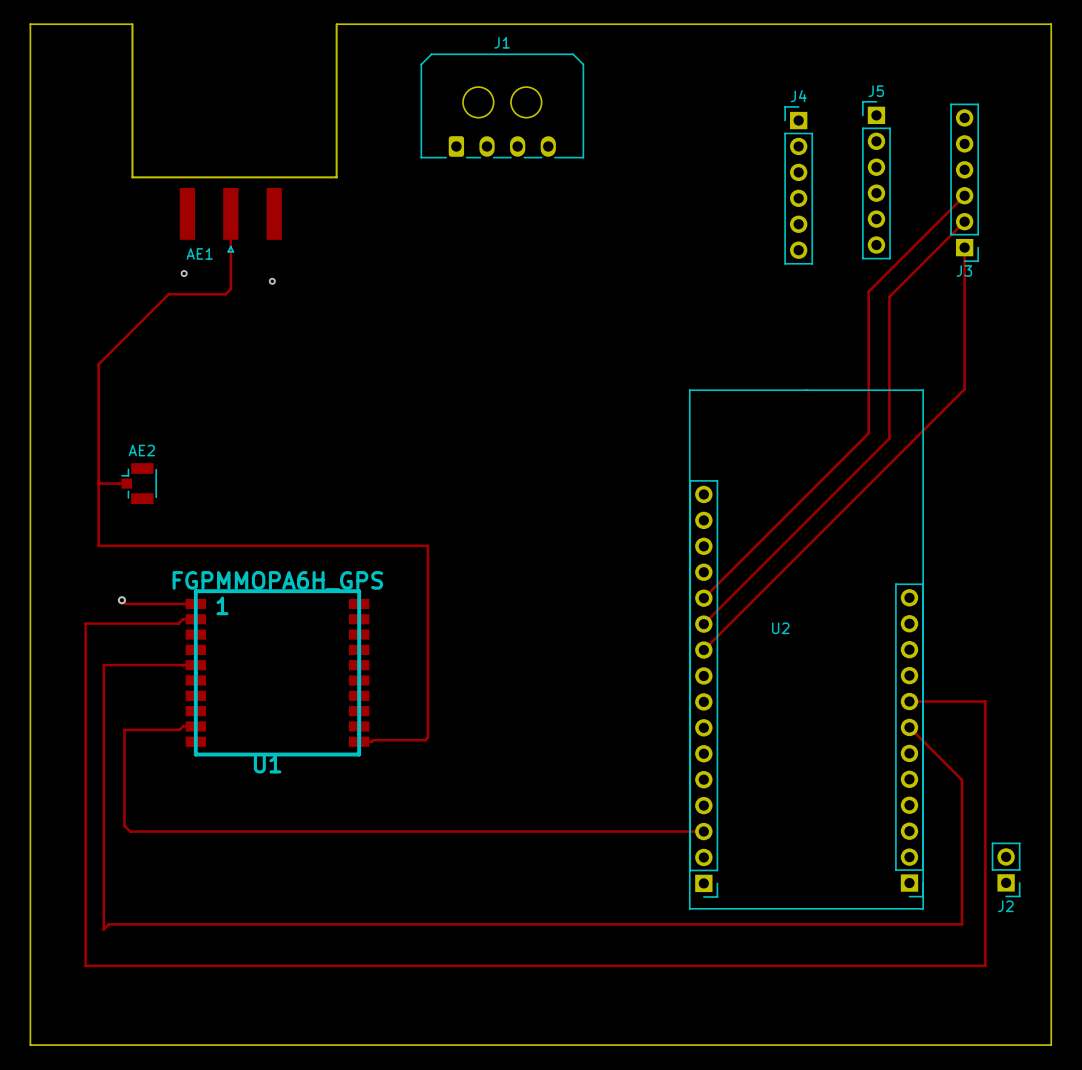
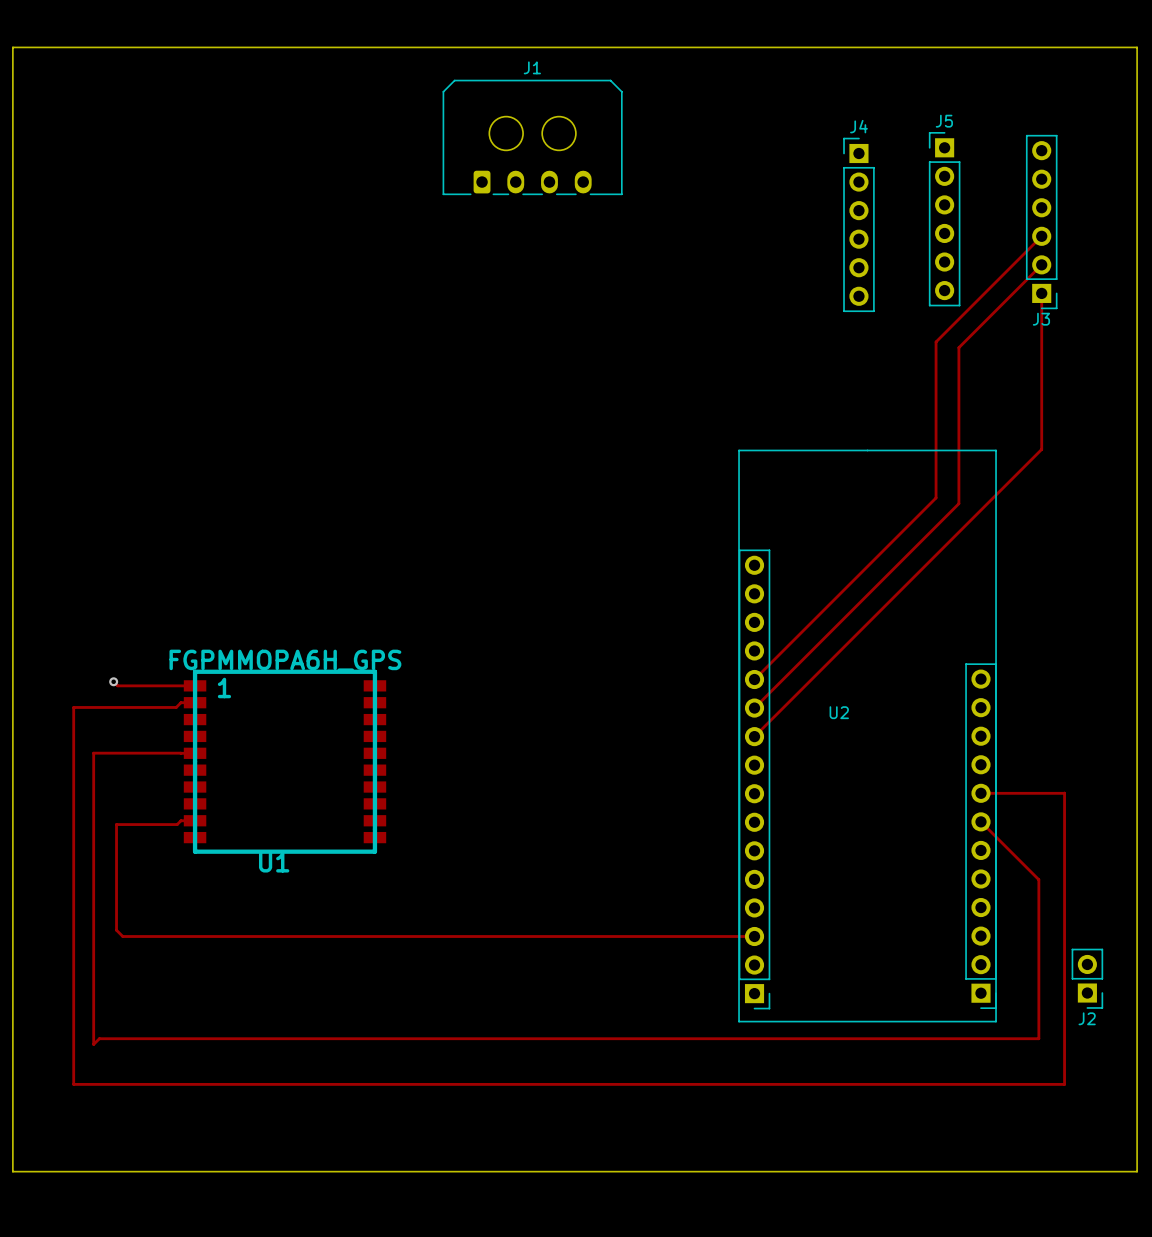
board edge: (132, 24) (132, 177) (336, 177) (336, 24) -> (125, 47) (350, 47)
AE1: (230, 220) -> none
track: (230, 221) (230, 289) (225, 294) (168, 294) (98, 364) (98, 545) (427, 545) (427, 737) (425, 740) (359, 741) -> none
via: (184, 273) -> none
via: (272, 281) -> none
track: (98, 480) (101, 483) (126, 483) -> none
AE2: (139, 483) -> none

